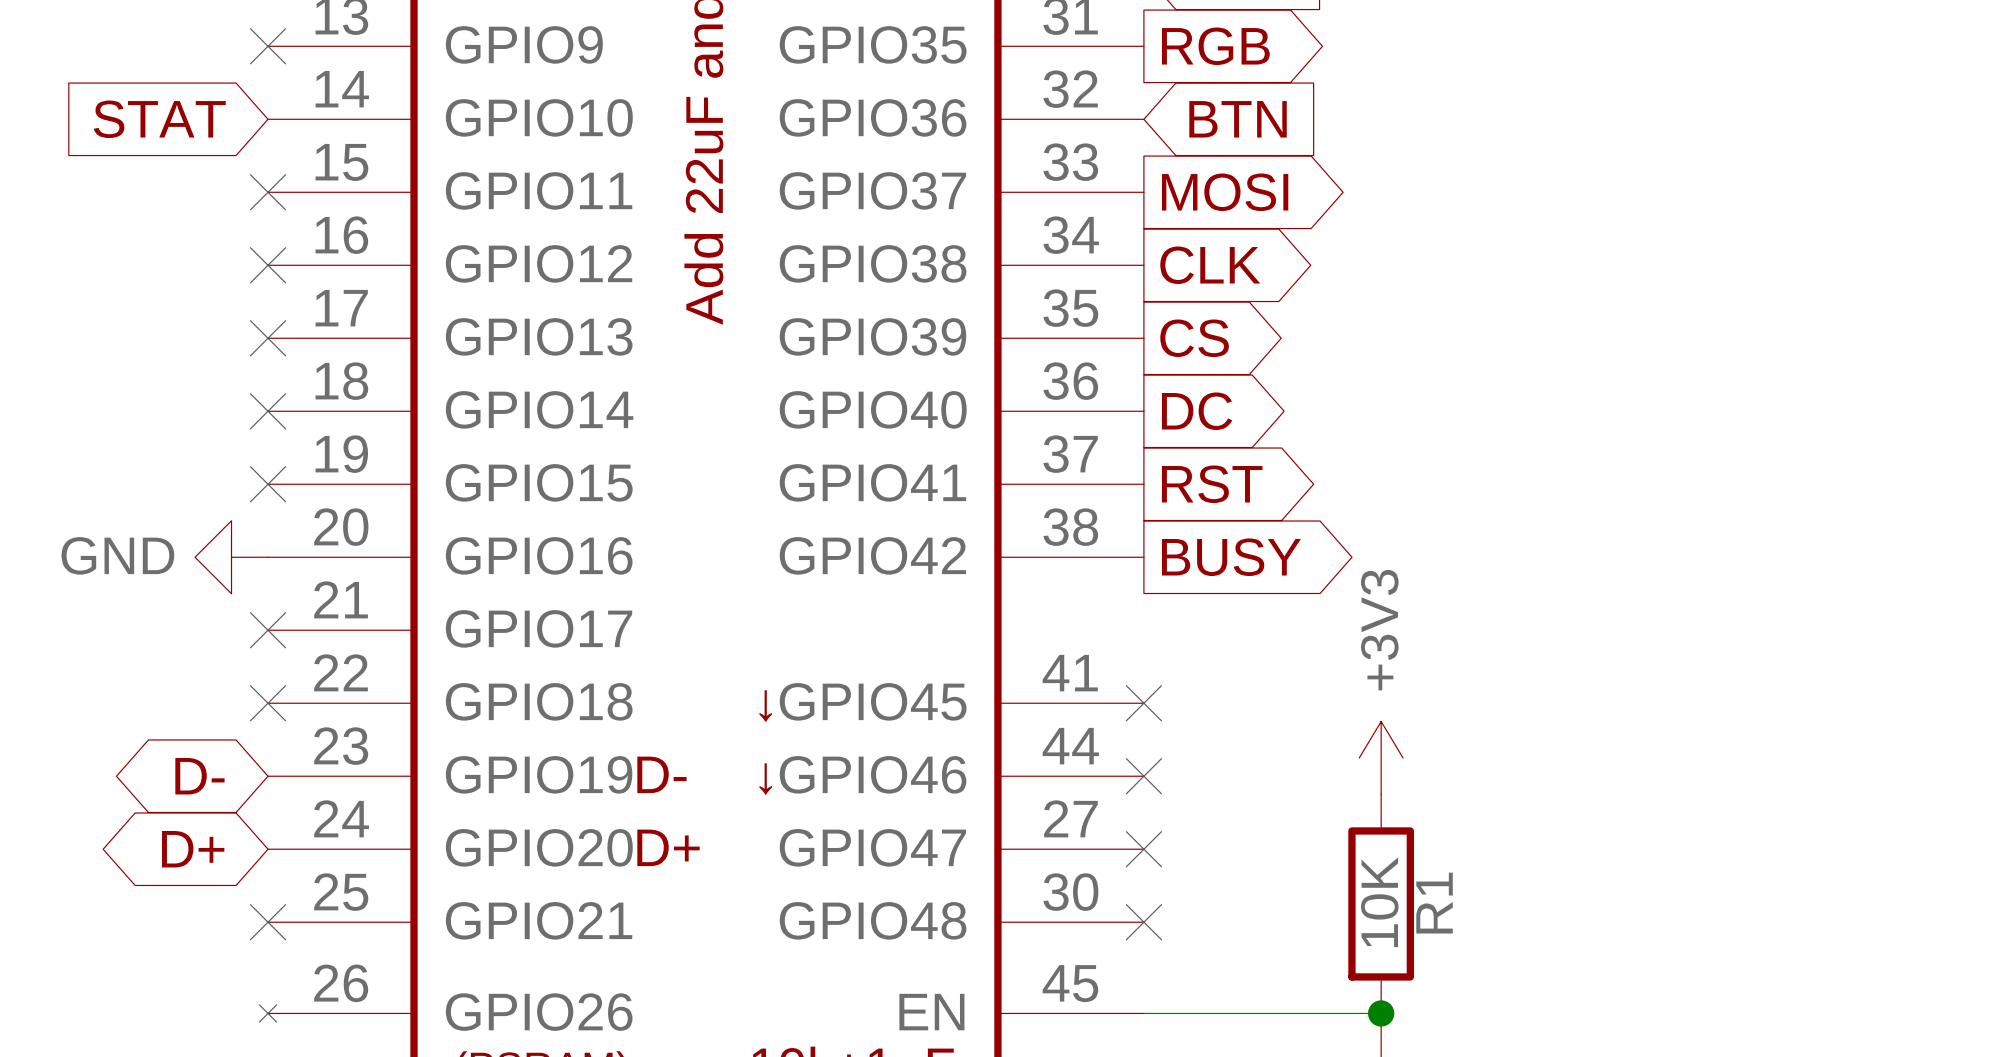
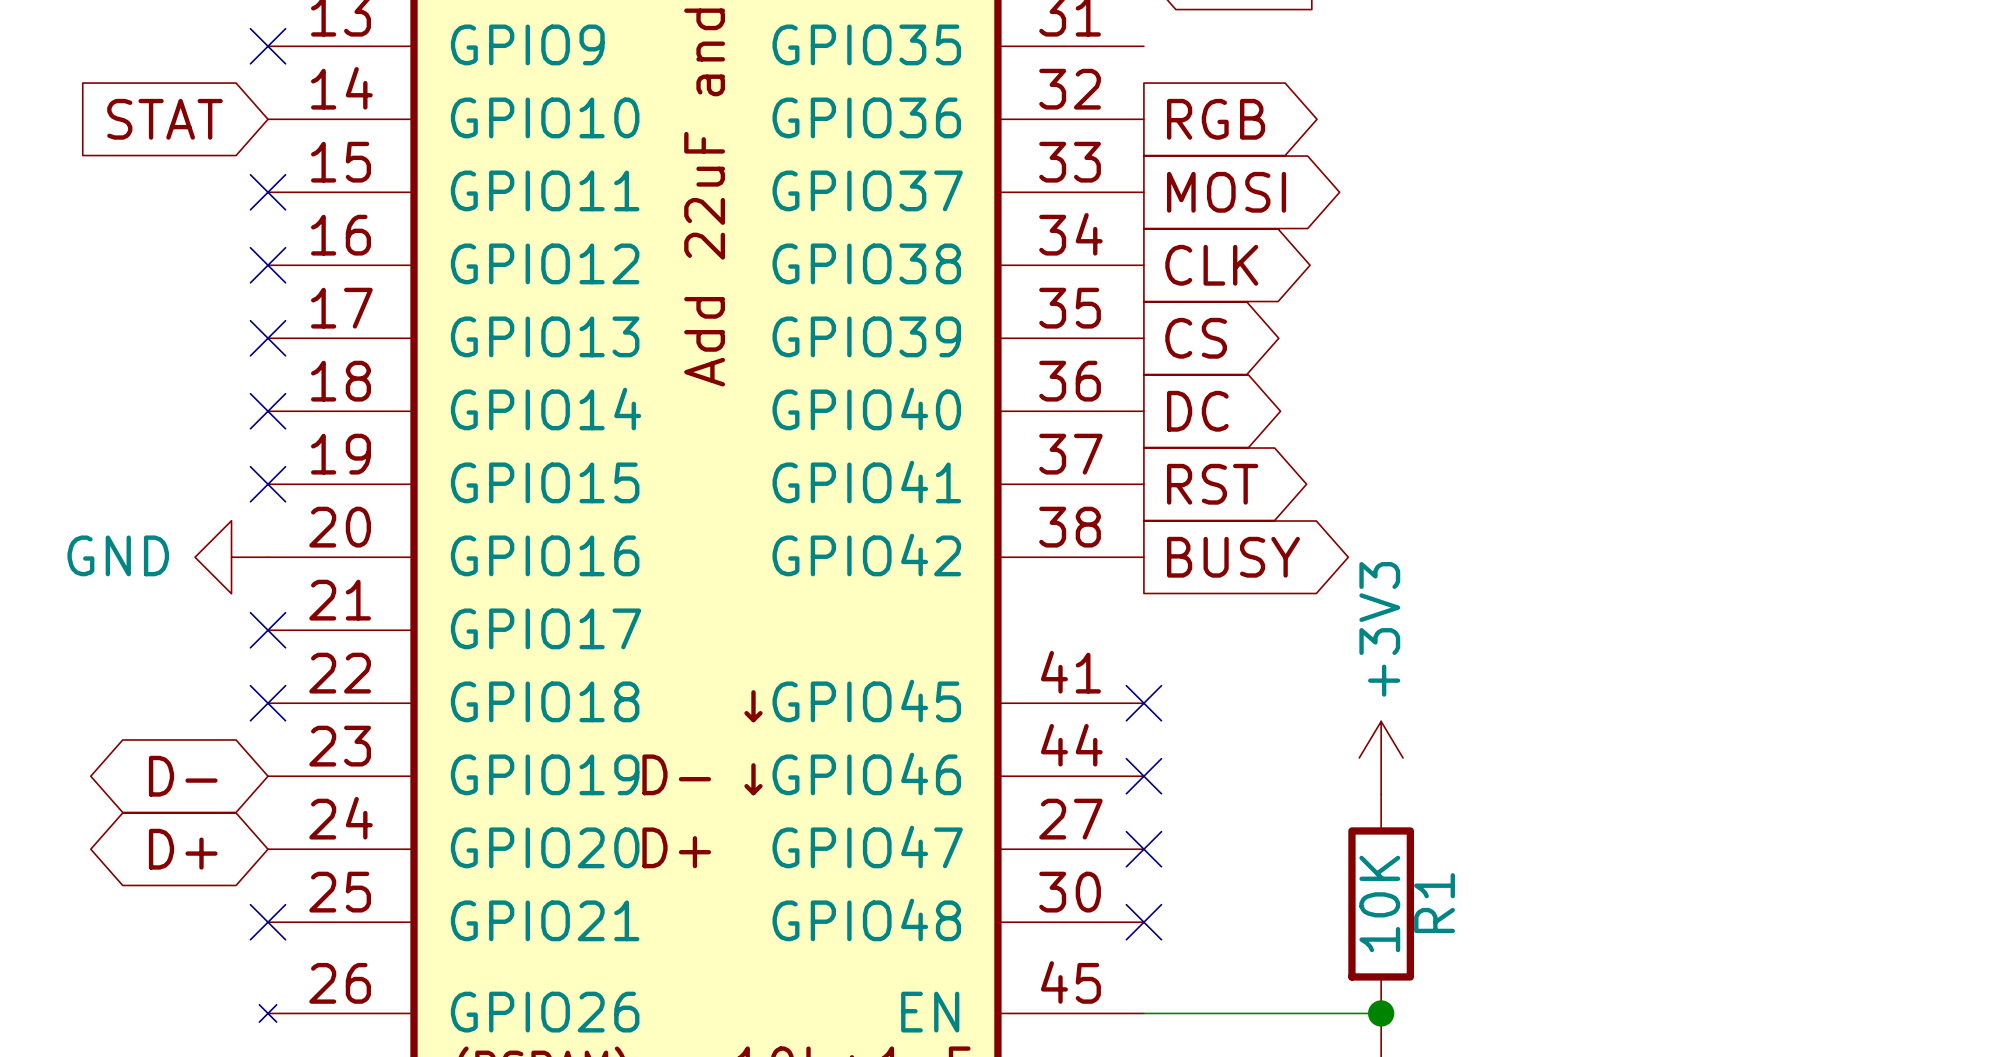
global label: RGB (1215, 46) -> none
global label shape: input (1238, 119) -> output (1216, 119)
global label: BTN (1238, 119) -> RGB (1216, 119)

